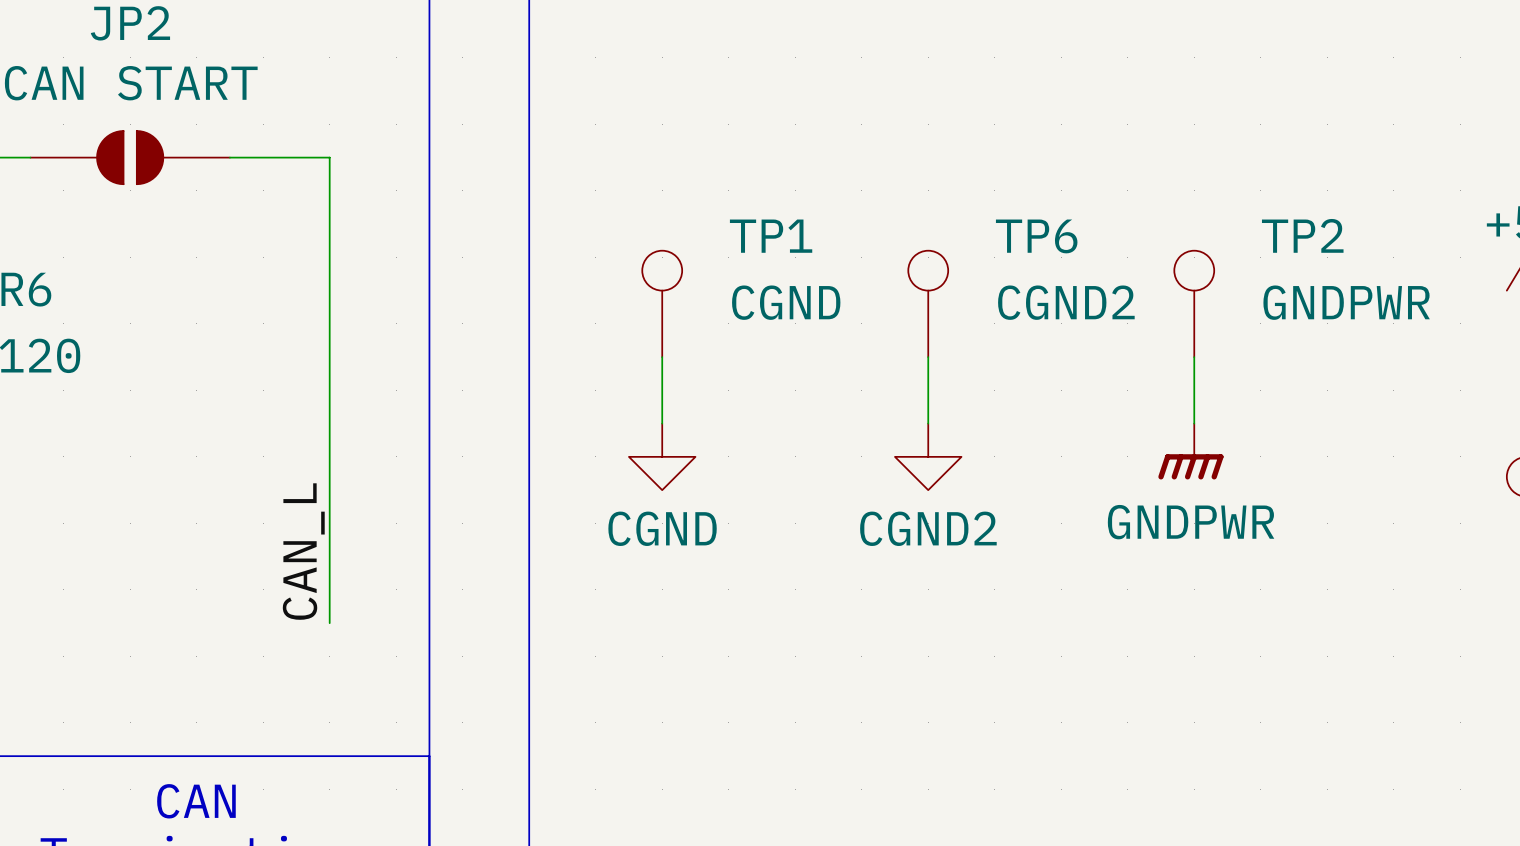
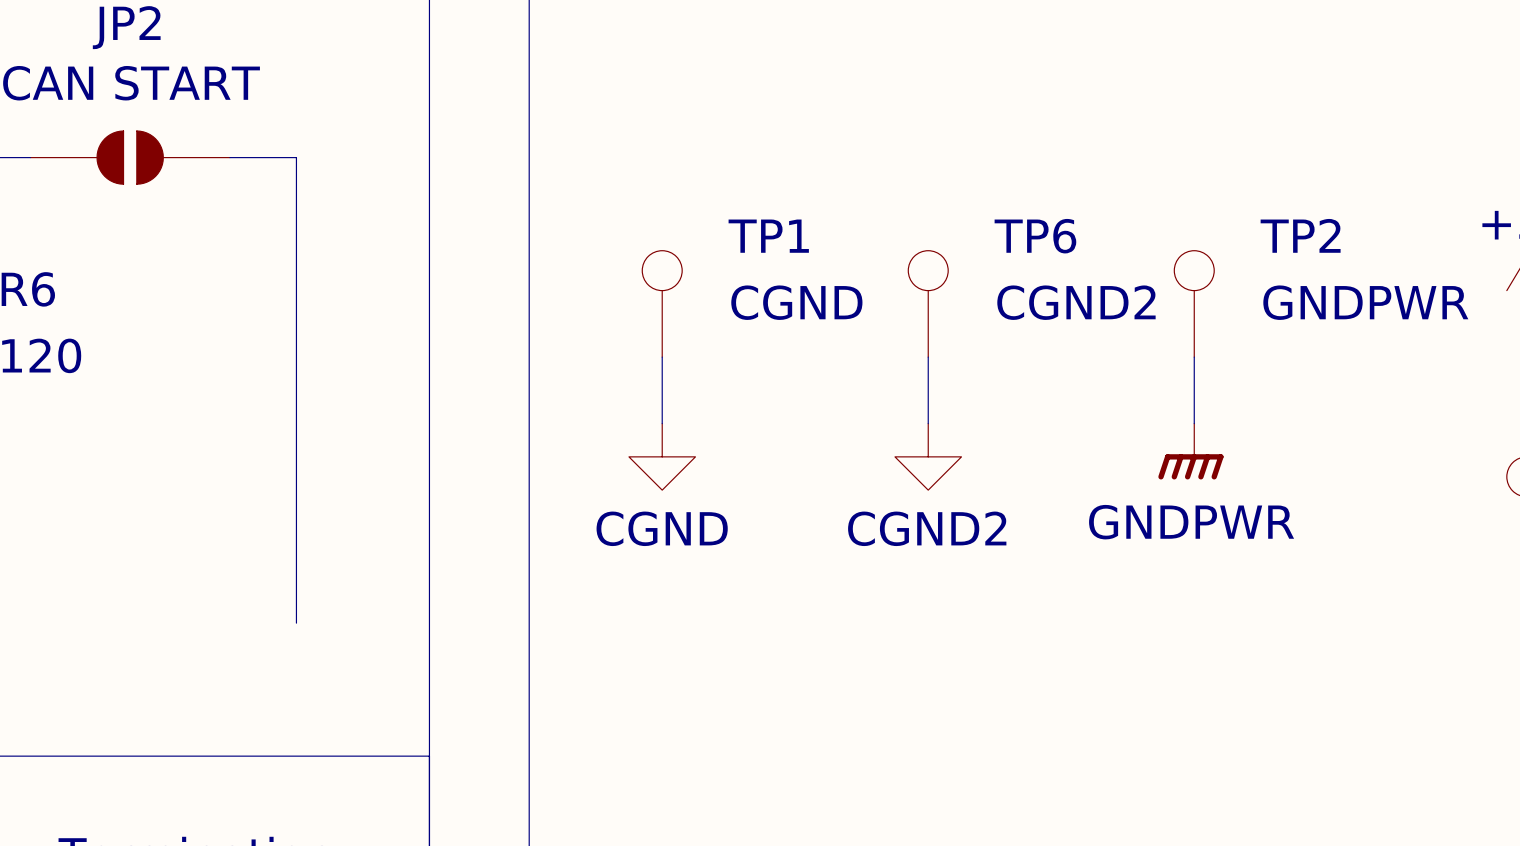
wire: (296, 157) (329, 157) (329, 623) -> (296, 157) (296, 623)
label: CAN_L (303, 551) -> none
text: CAN (196, 801) -> none

